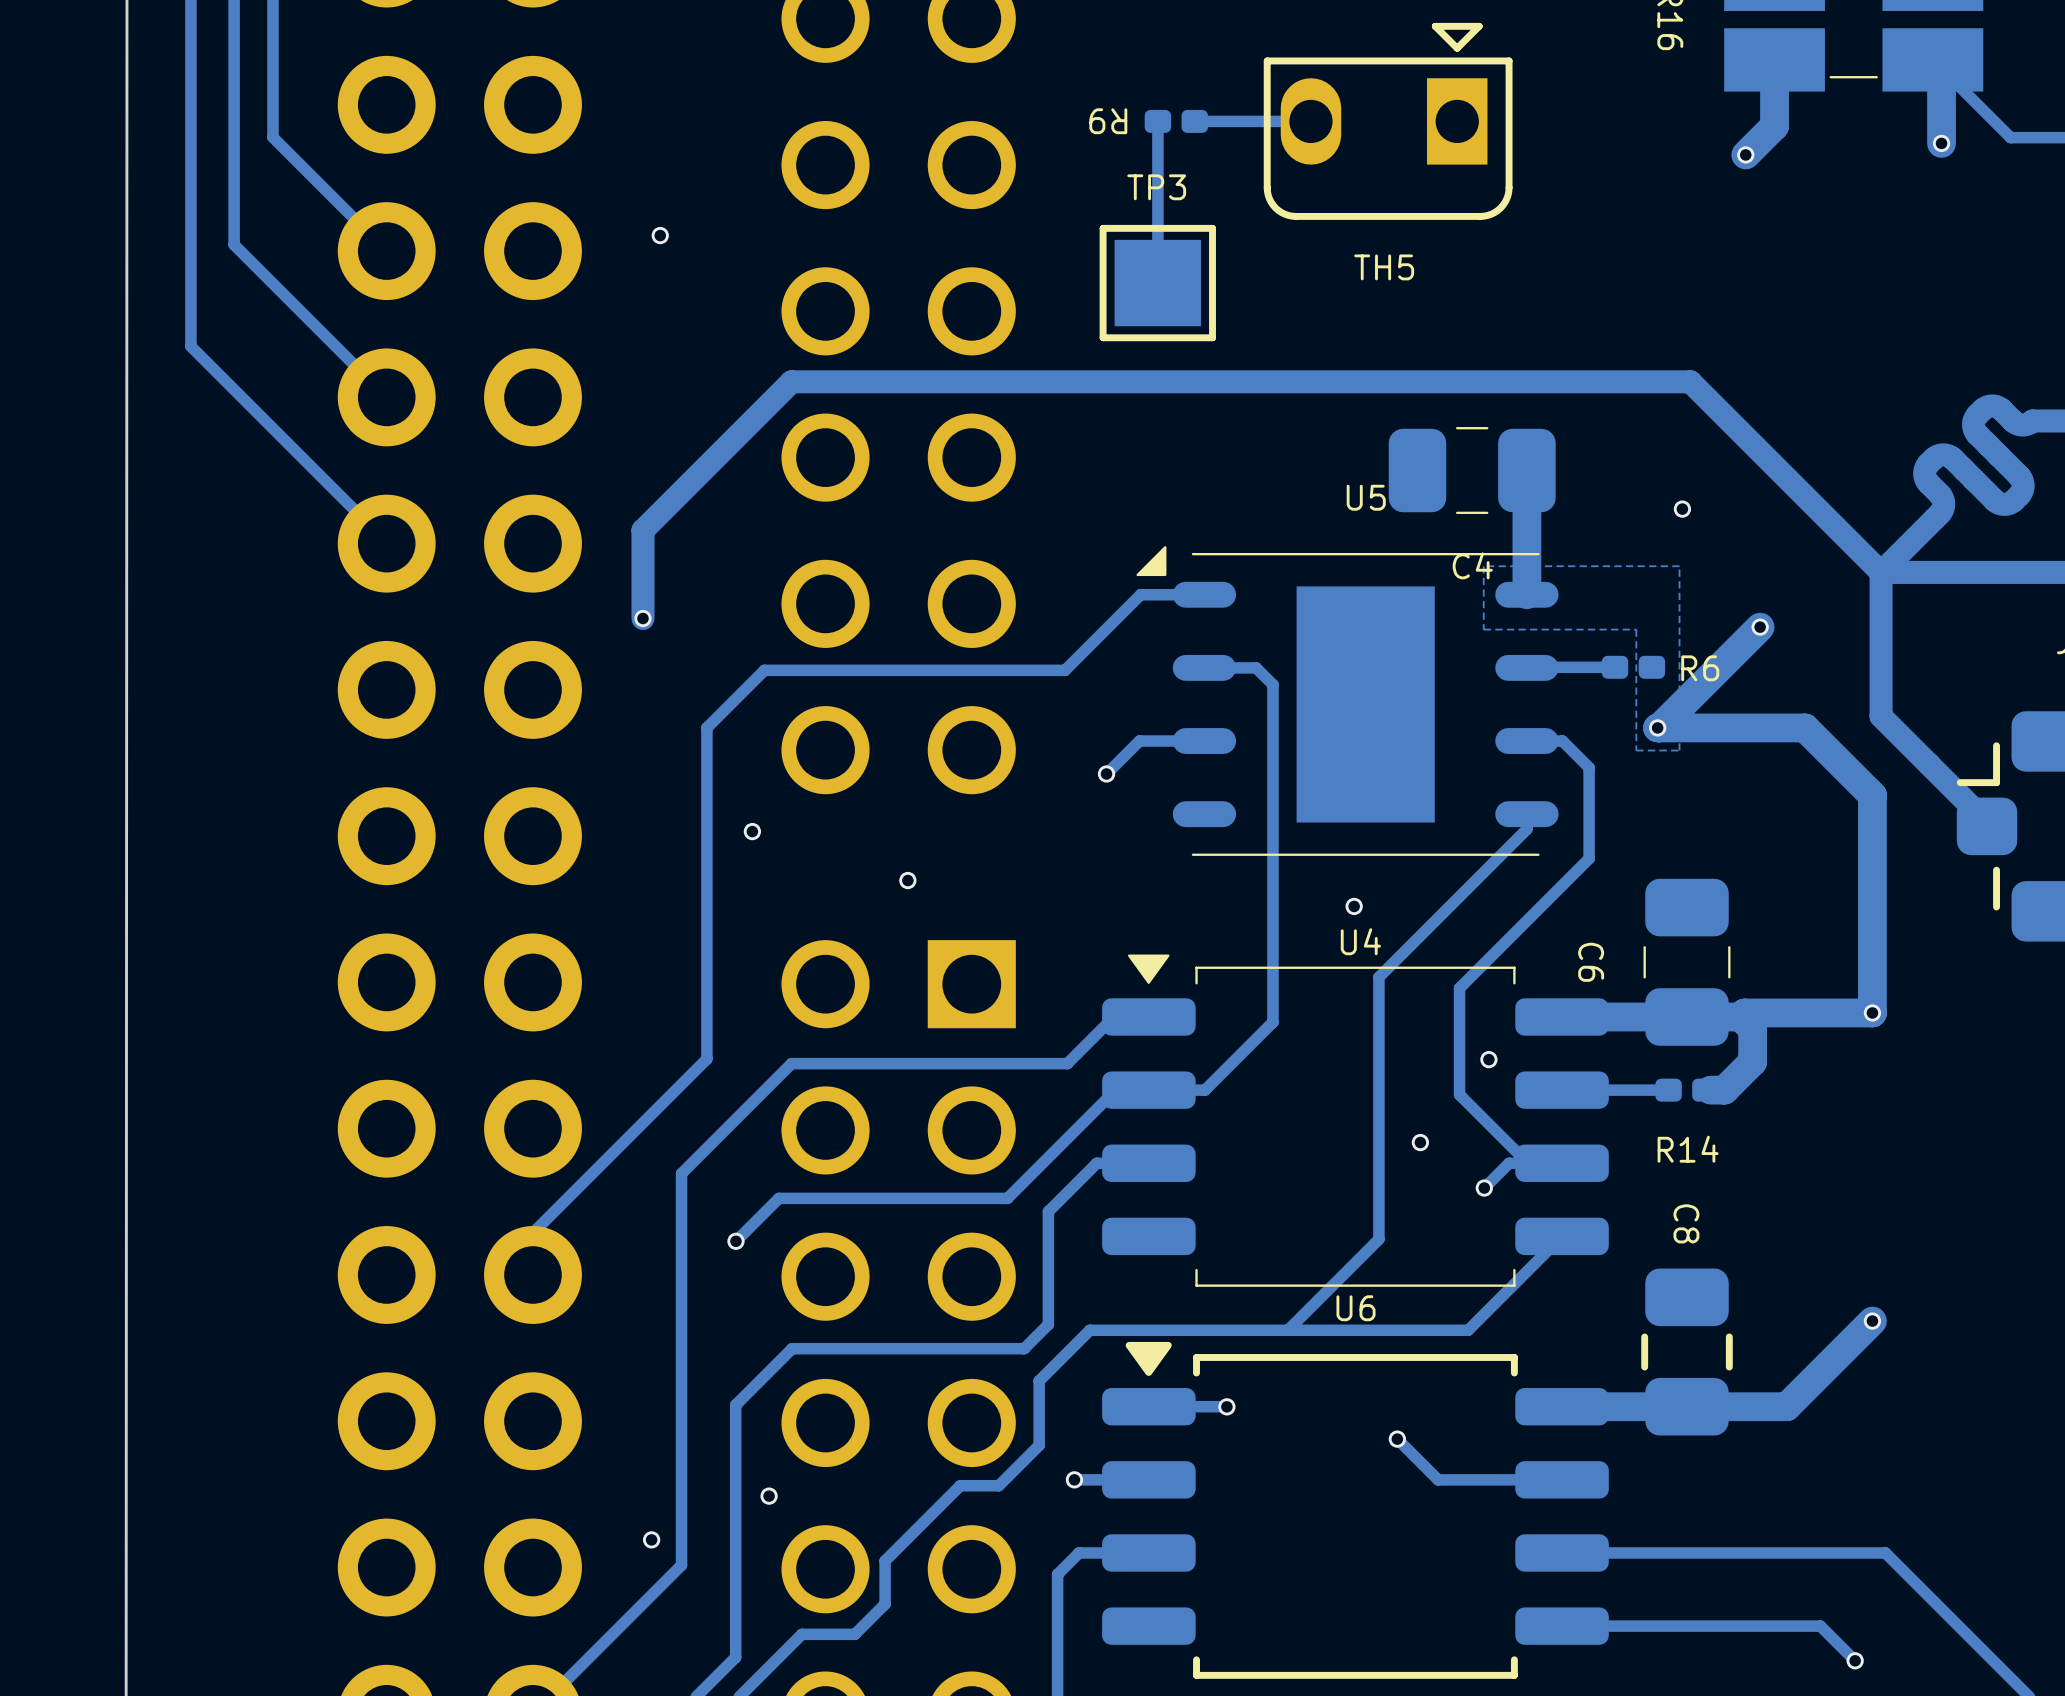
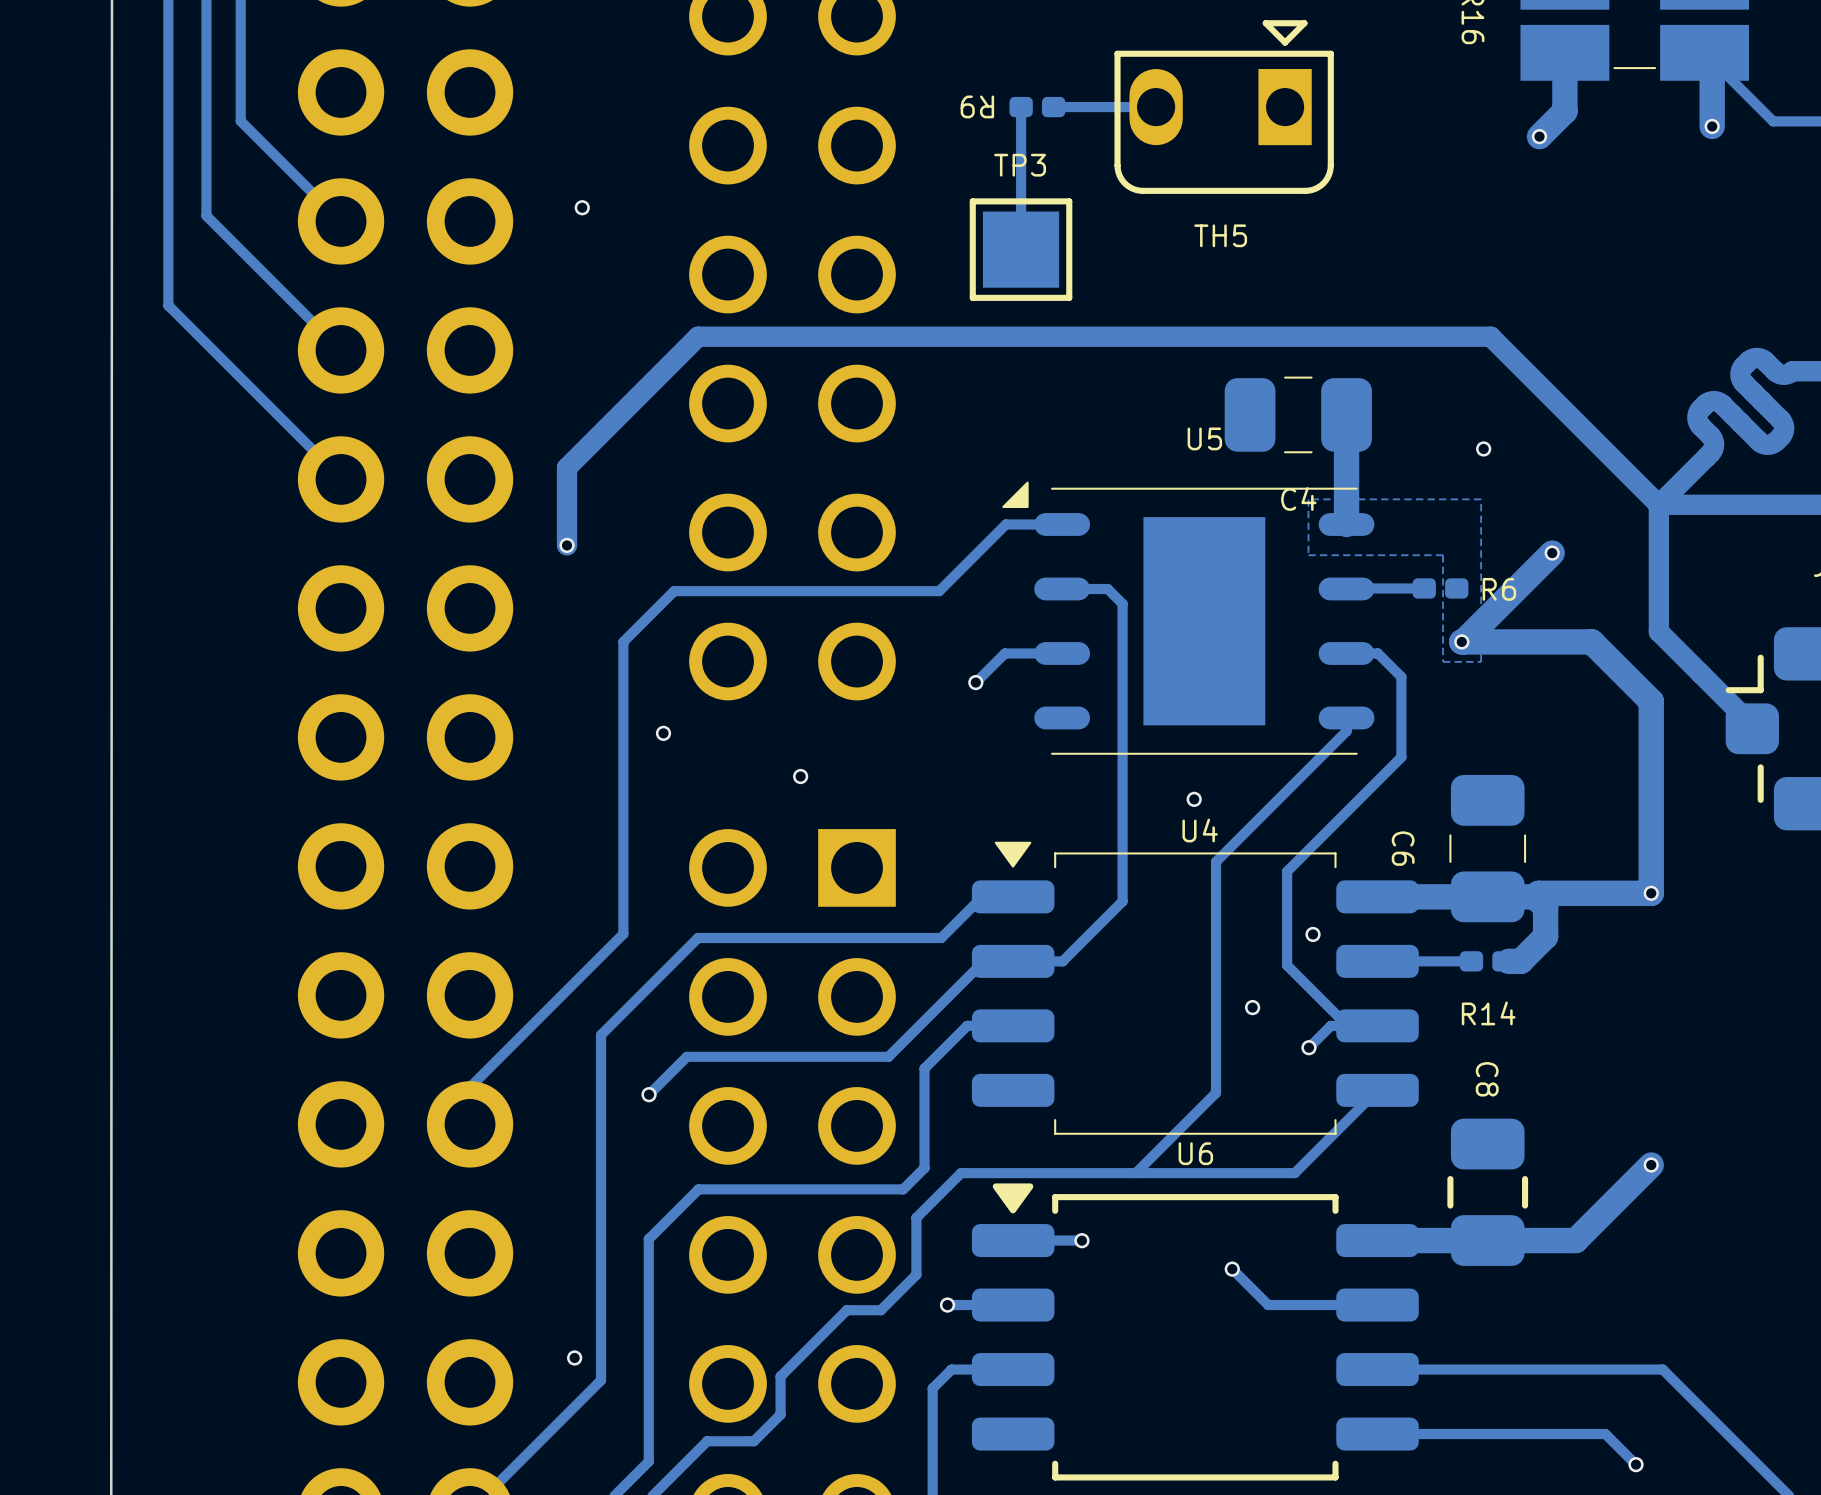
via: (769, 1496) -> none

